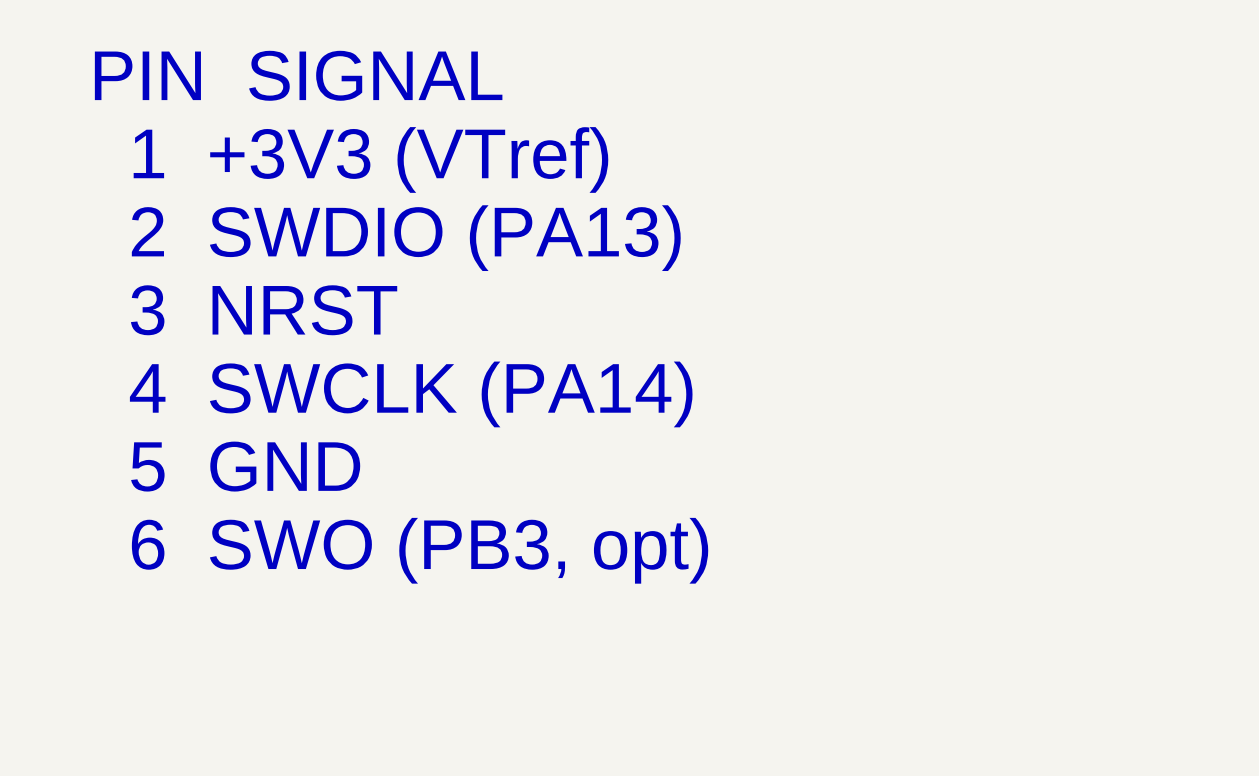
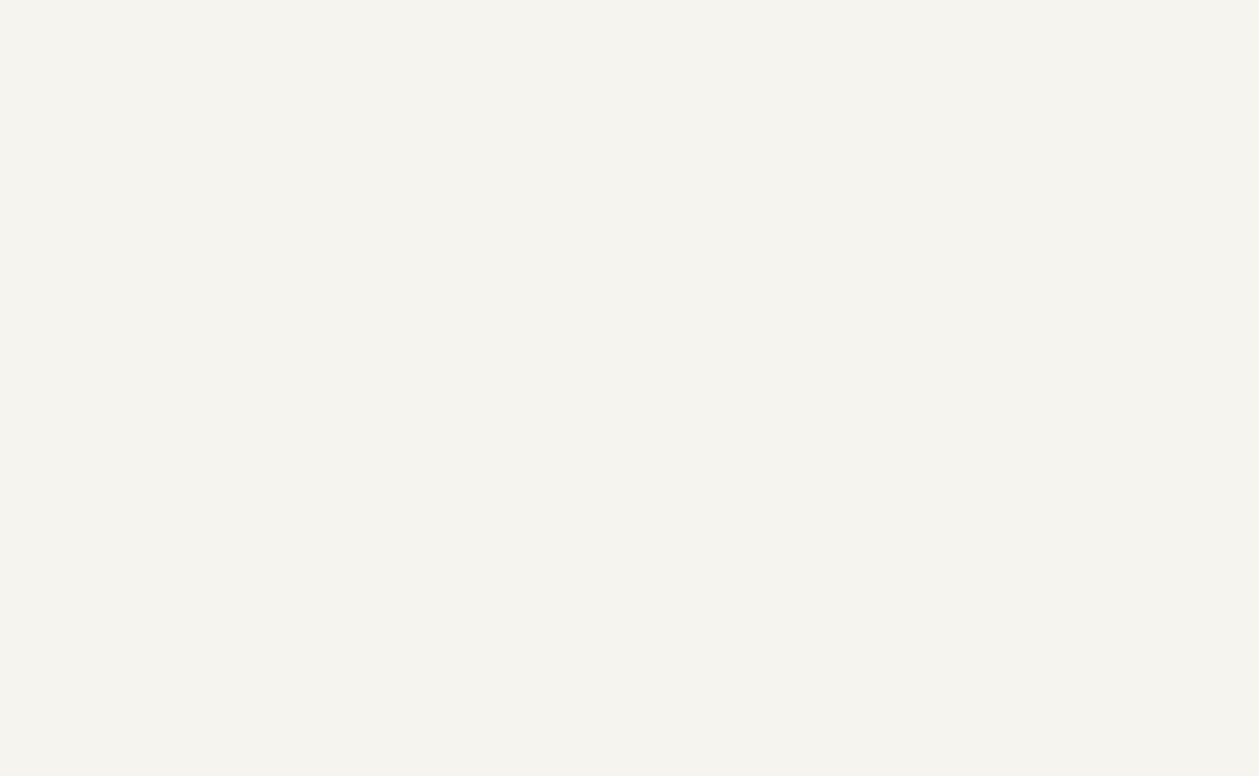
text: PIN SIGNAL (298, 75) -> none
text: 1 +3V3 (VTref) (370, 159) -> none
text: 2 SWDIO (PA13) (406, 238) -> none
text: 3 NRST (264, 310) -> none
text: 4 SWCLK (PA14) (411, 394) -> none
text: 5 GND (245, 466) -> none
text: 6 SWO (PB3, opt) (420, 550) -> none

